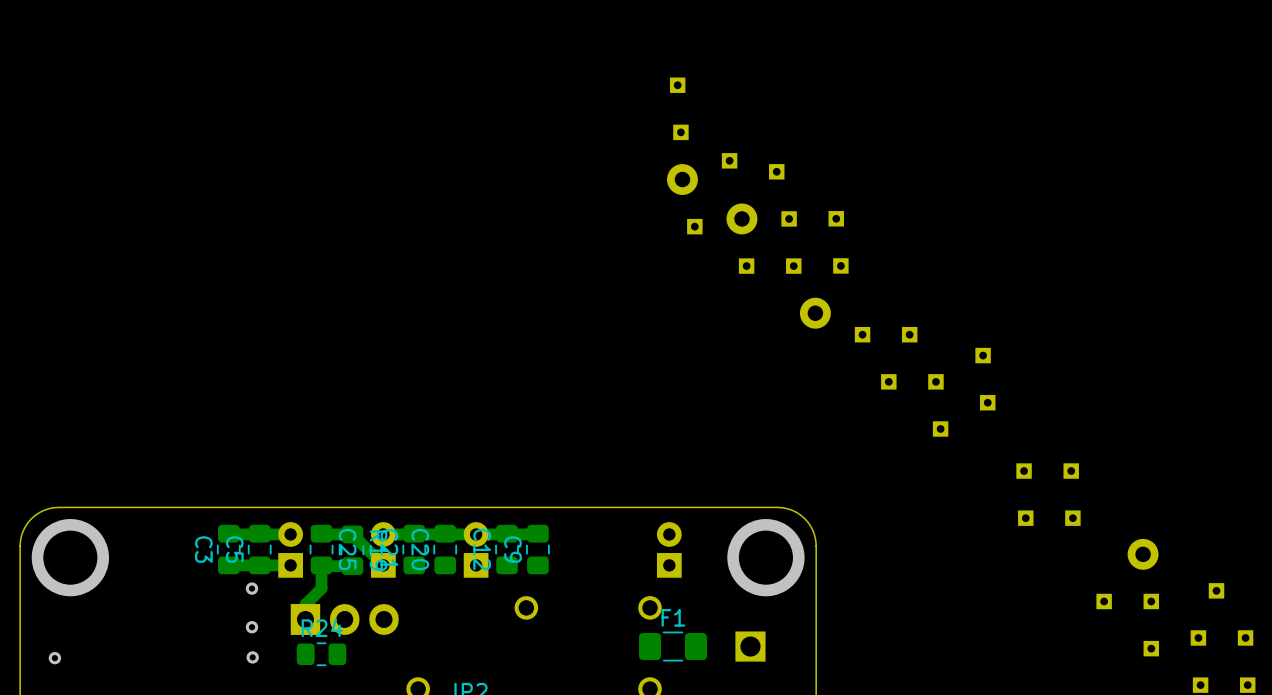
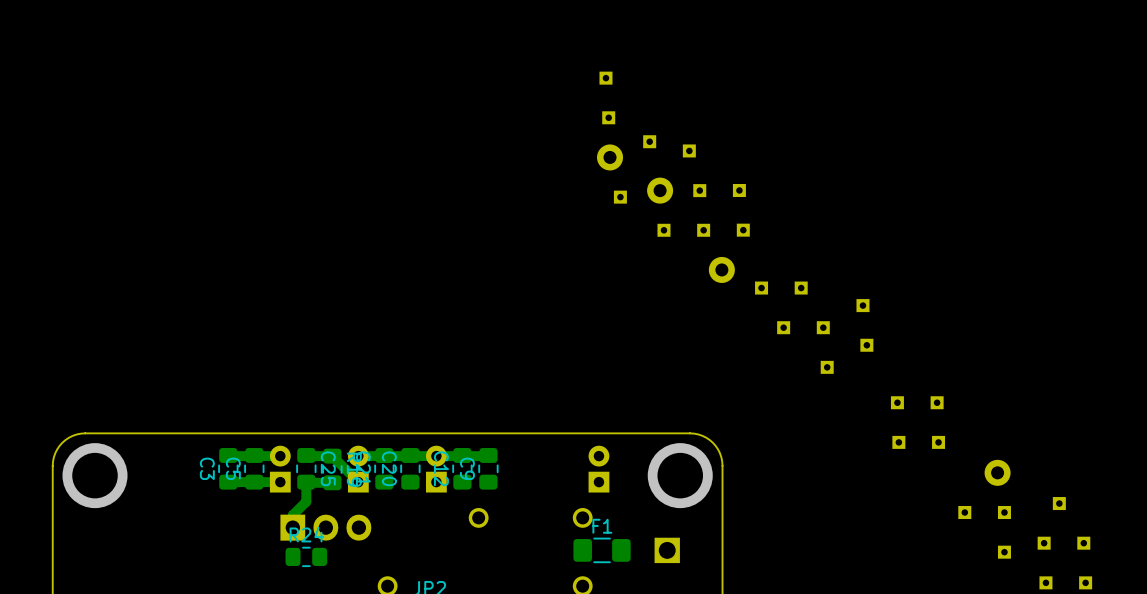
via: (251, 588) -> none
via: (251, 627) -> none
via: (252, 657) -> none
via: (54, 658) -> none

